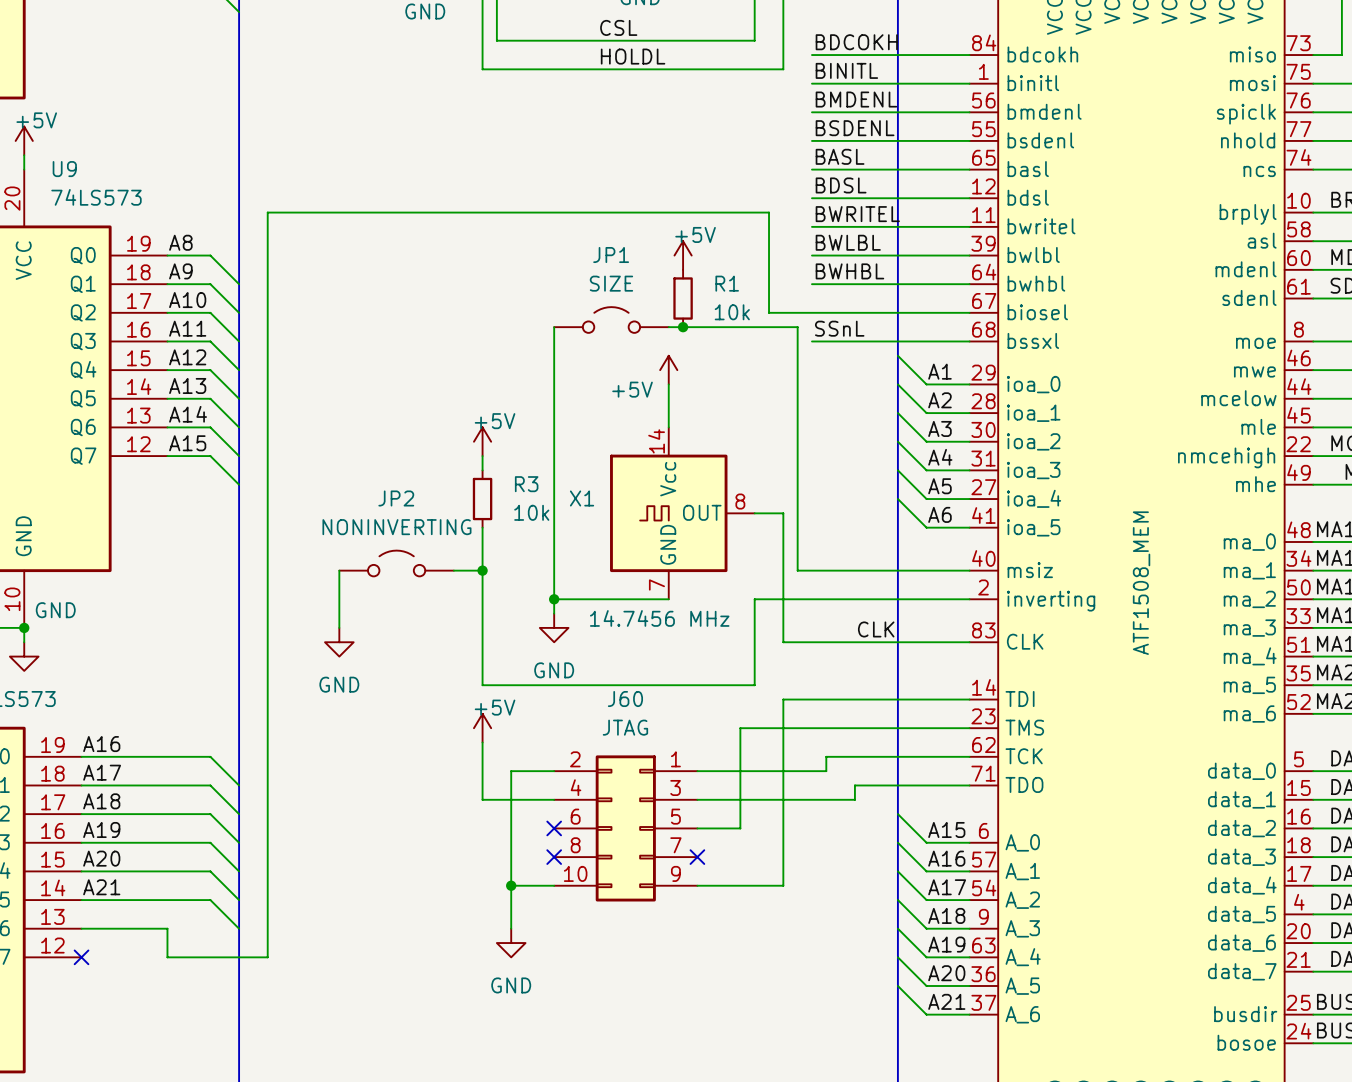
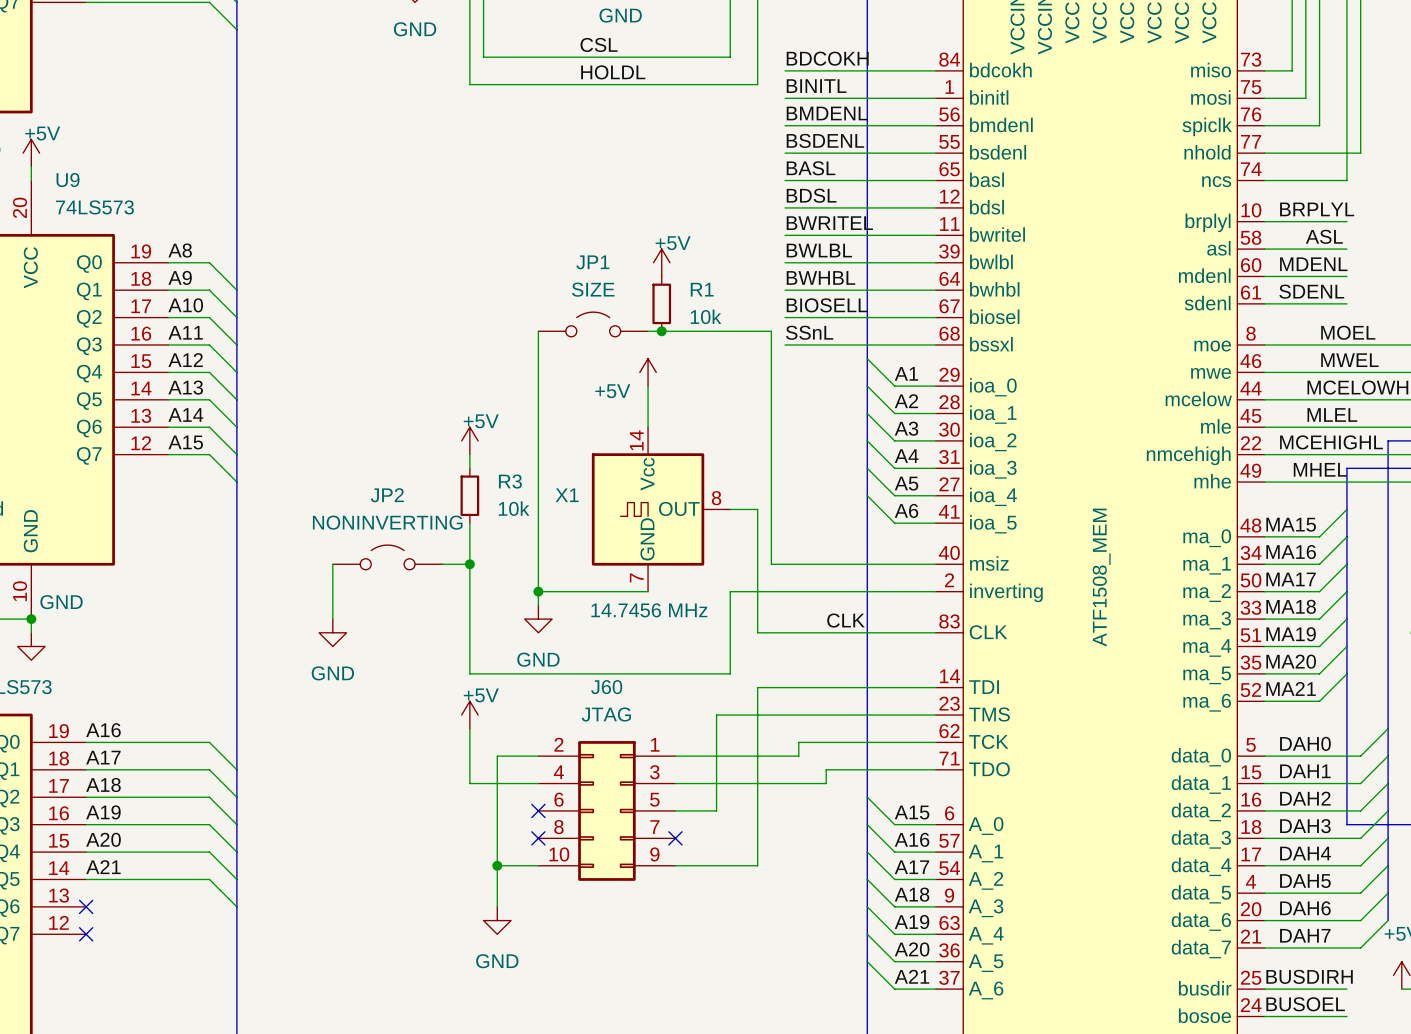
label: none -> BIOSELL (827, 305)
wire: (811, 312) (769, 312) (769, 212) (267, 212) (267, 957) (167, 957) (167, 928) (81, 928) -> none
no-connect mark: none -> (86, 906)

